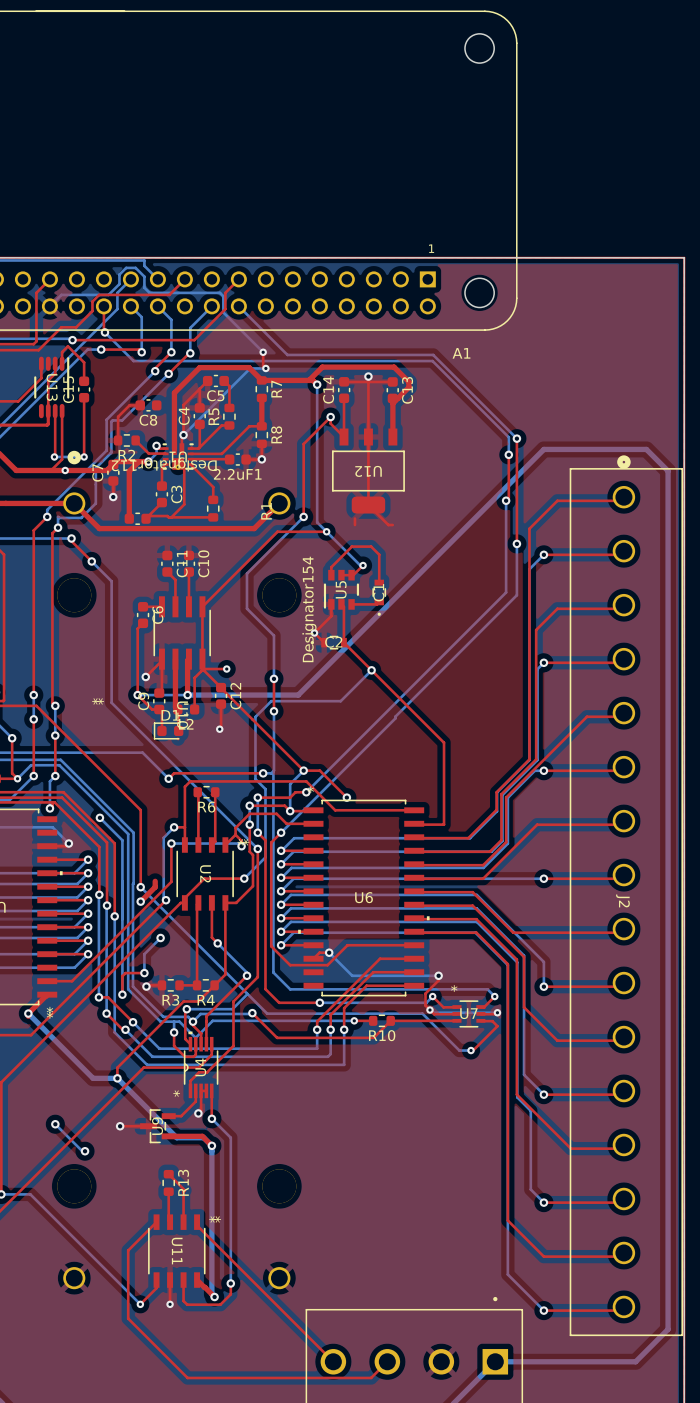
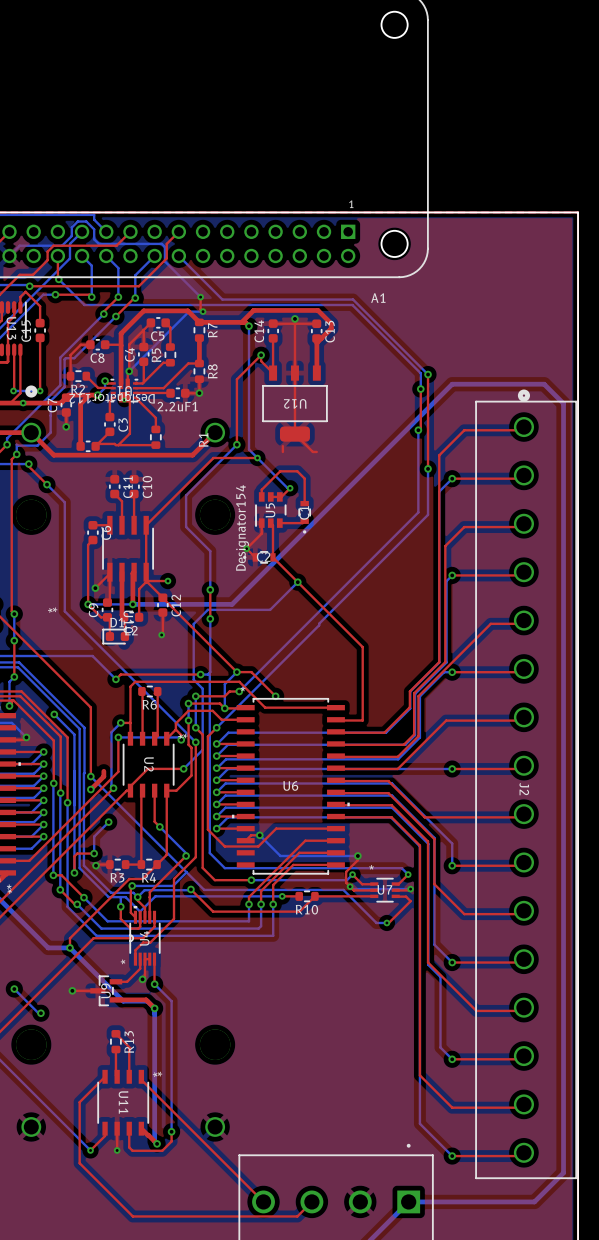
top track: none -> (105, 344) (121, 345)

